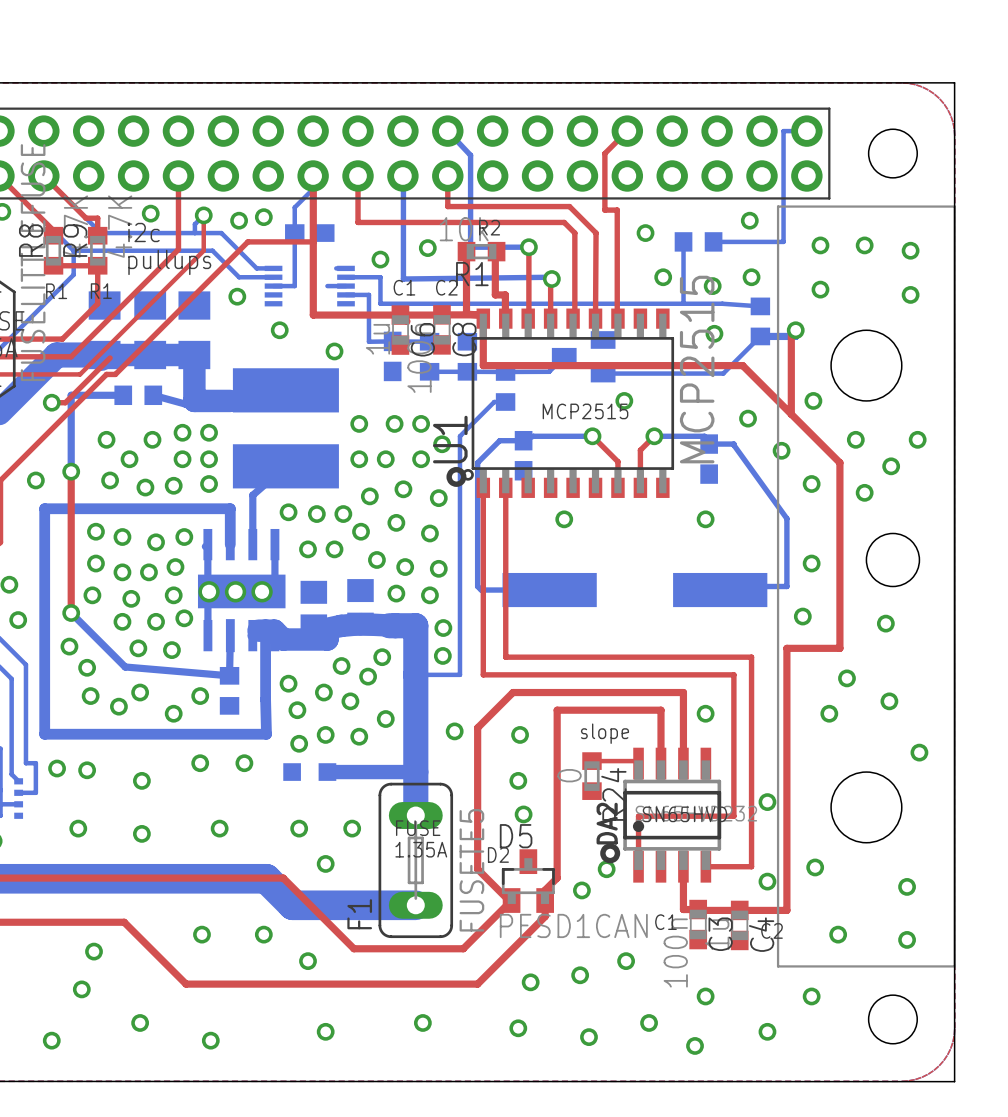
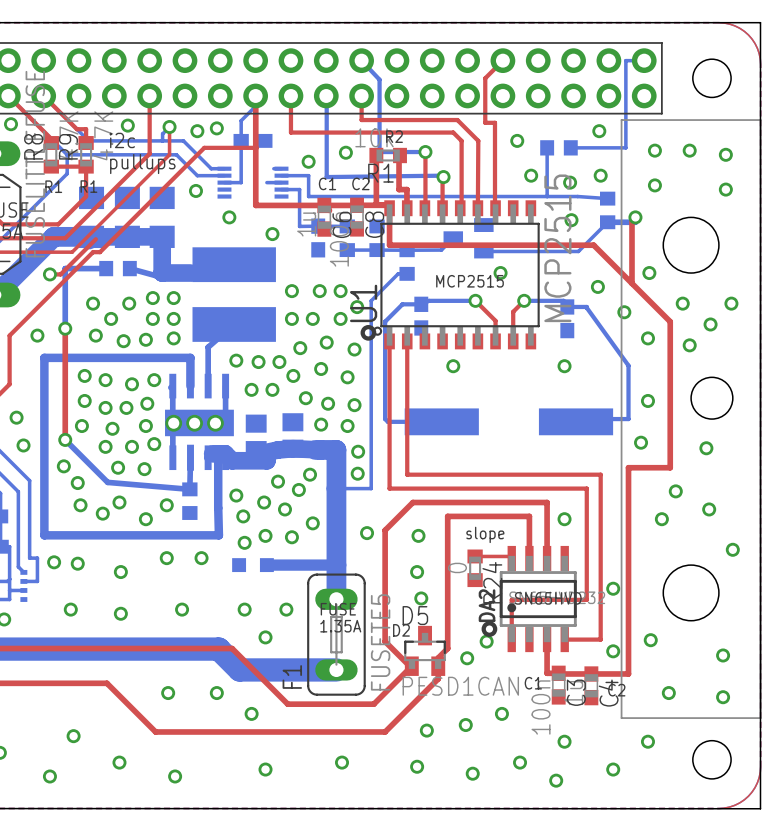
via: (94, 951) -> none

